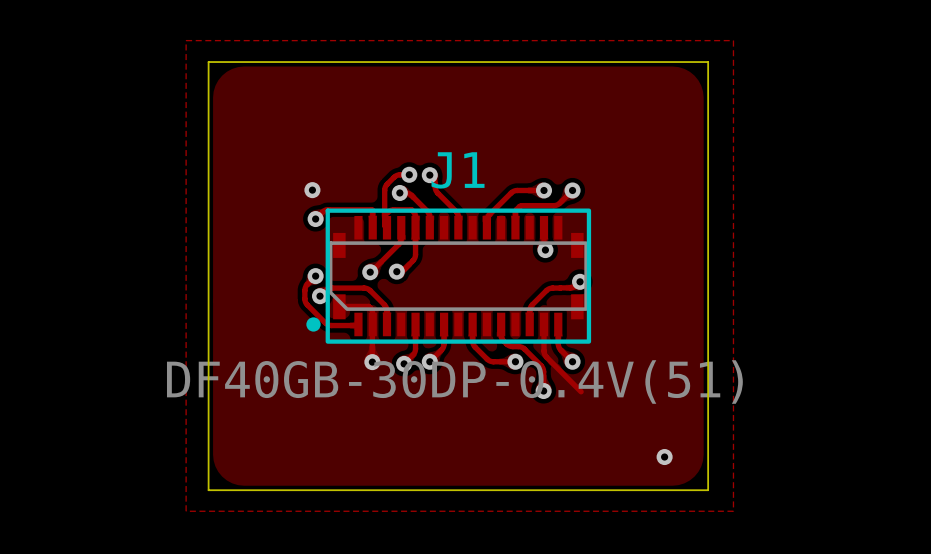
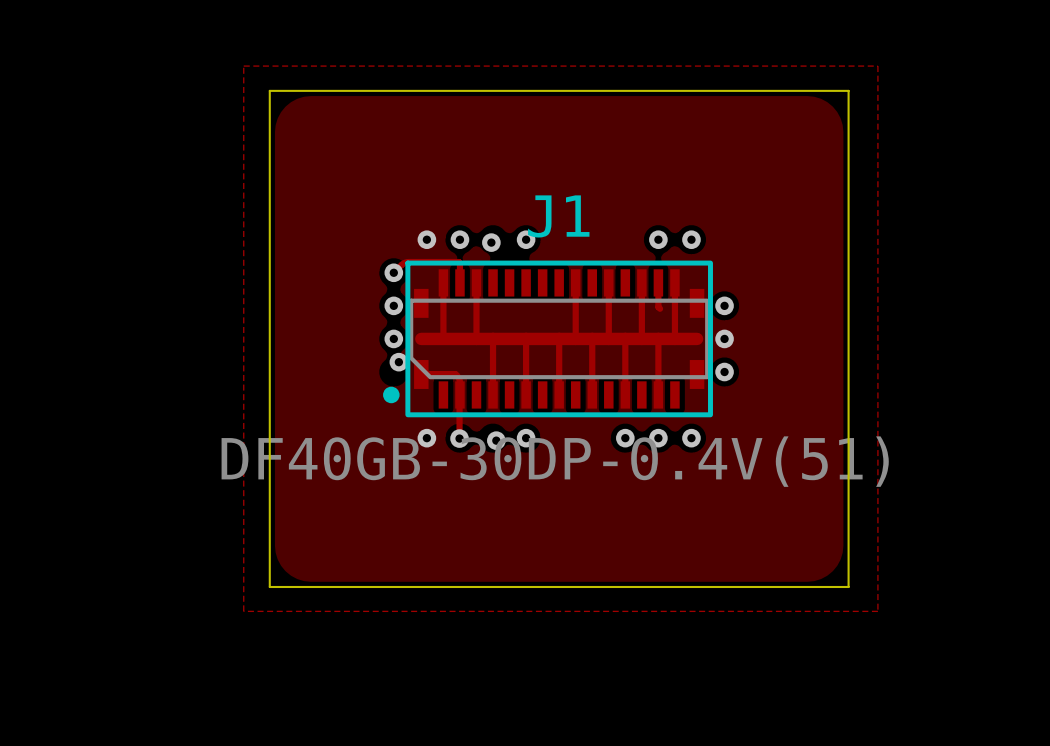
track: (409, 174) (395, 175) (385, 186) (384, 225) (387, 227) -> (476, 338) (476, 282)
via: (409, 174) -> none
track: (429, 175) (434, 180) (437, 192) (457, 212) (458, 227) -> none
via position: (429, 175) -> (526, 239)
via: (312, 190) -> none
via: none -> (426, 239)
via: none -> (459, 239)
track: (544, 190) (512, 191) (488, 215) (486, 227) -> none
track: (572, 190) (555, 205) (520, 206) (515, 211) (515, 227) -> none
track: (399, 192) (410, 194) (427, 211) (429, 227) -> none
track: (384, 215) (392, 209) (411, 209) (415, 215) (415, 256) (404, 269) (396, 271) (398, 273) -> none
track: none -> (443, 282) (443, 338)
track: (401, 227) (399, 243) (370, 272) -> none
track: none -> (575, 282) (575, 338)
track: none -> (608, 282) (608, 338)
track: none -> (641, 282) (641, 338)
track: none -> (674, 282) (674, 338)
via: none -> (393, 305)
via: none -> (724, 305)
via: (545, 250) -> none
via: (396, 271) -> none
via: (370, 272) -> none
track: (315, 276) (305, 288) (306, 304) (328, 324) (358, 324) -> none
track: none -> (421, 338) (697, 338)
track: none -> (493, 338) (493, 394)
track: none -> (526, 338) (526, 394)
track: none -> (559, 338) (559, 394)
track: none -> (592, 338) (592, 394)
track: none -> (625, 338) (625, 394)
via: none -> (724, 338)
track: (580, 281) (572, 287) (560, 287) -> none
via: (580, 281) -> none
track: (560, 288) (548, 289) (531, 305) (529, 324) -> none
track: (320, 296) (330, 288) (367, 288) (385, 306) (387, 324) -> none
via: none -> (724, 372)
track: (415, 324) (415, 351) (404, 363) -> none
track: (444, 324) (443, 347) (429, 361) -> none
track: (472, 324) (473, 344) (488, 359) (515, 361) -> none
track: (501, 324) (501, 336) (503, 341) (509, 345) (523, 348) (542, 366) (543, 391) -> none
track: (544, 324) (545, 355) (581, 391) -> (658, 394) (658, 338)
track: (558, 324) (558, 347) (572, 361) -> none
via: none -> (426, 438)
via position: (543, 391) -> (658, 438)
via: (664, 457) -> none

